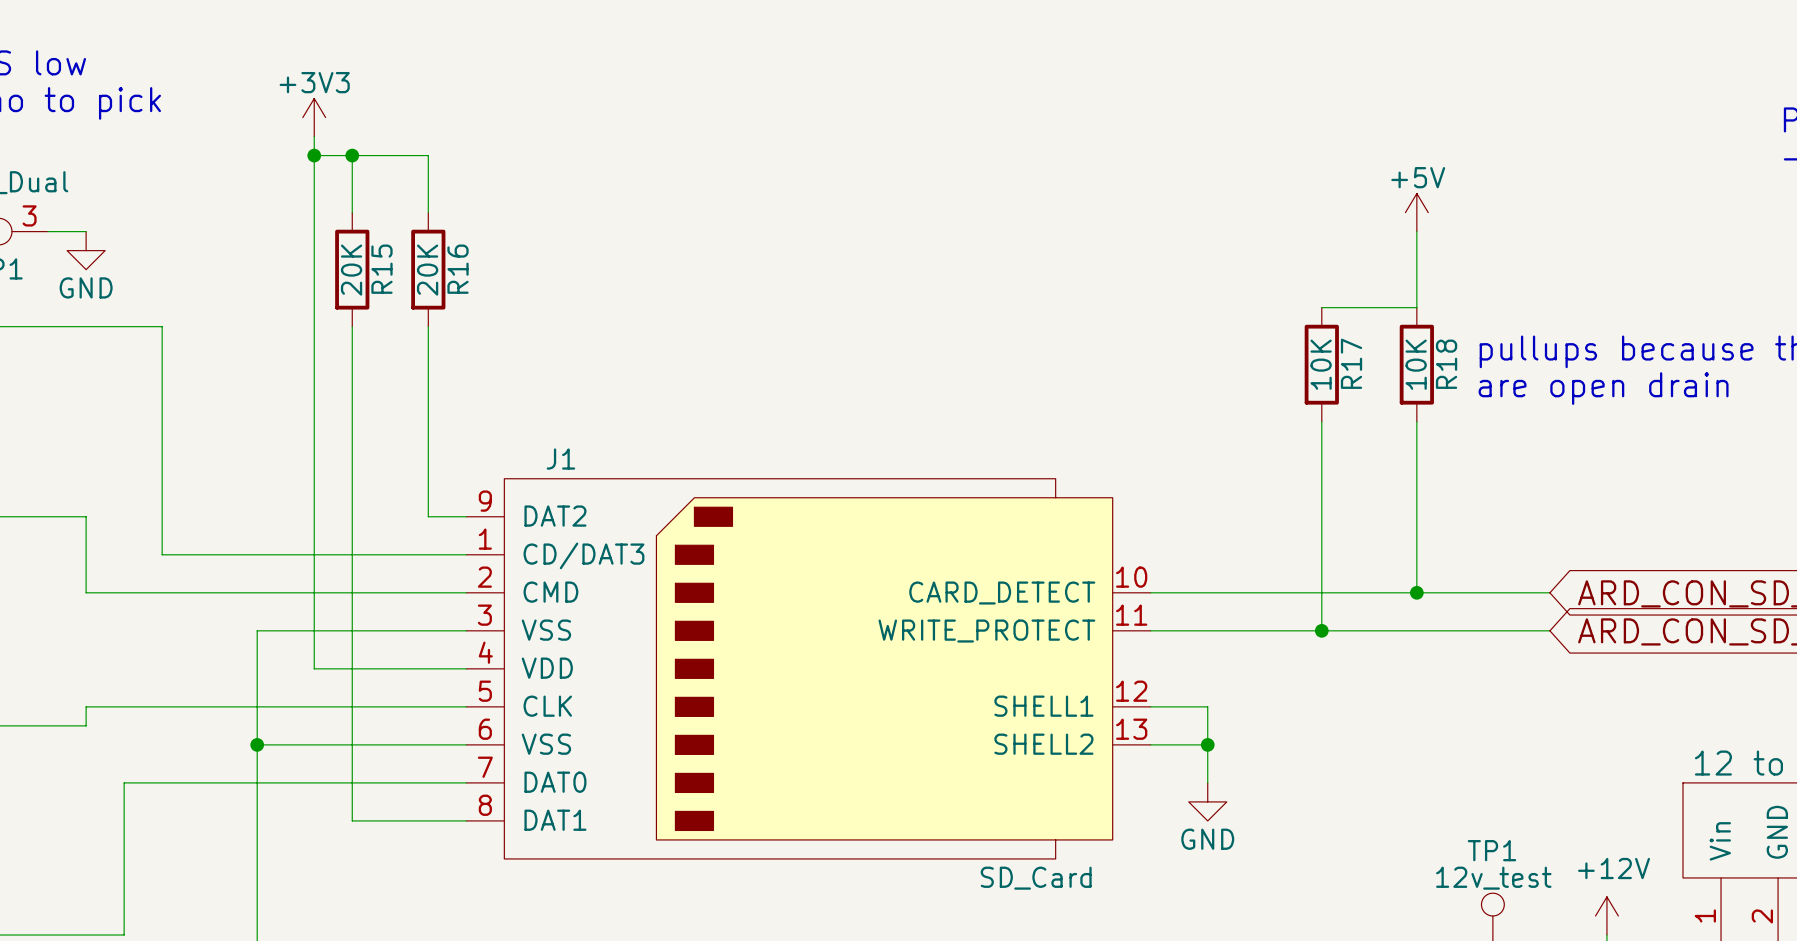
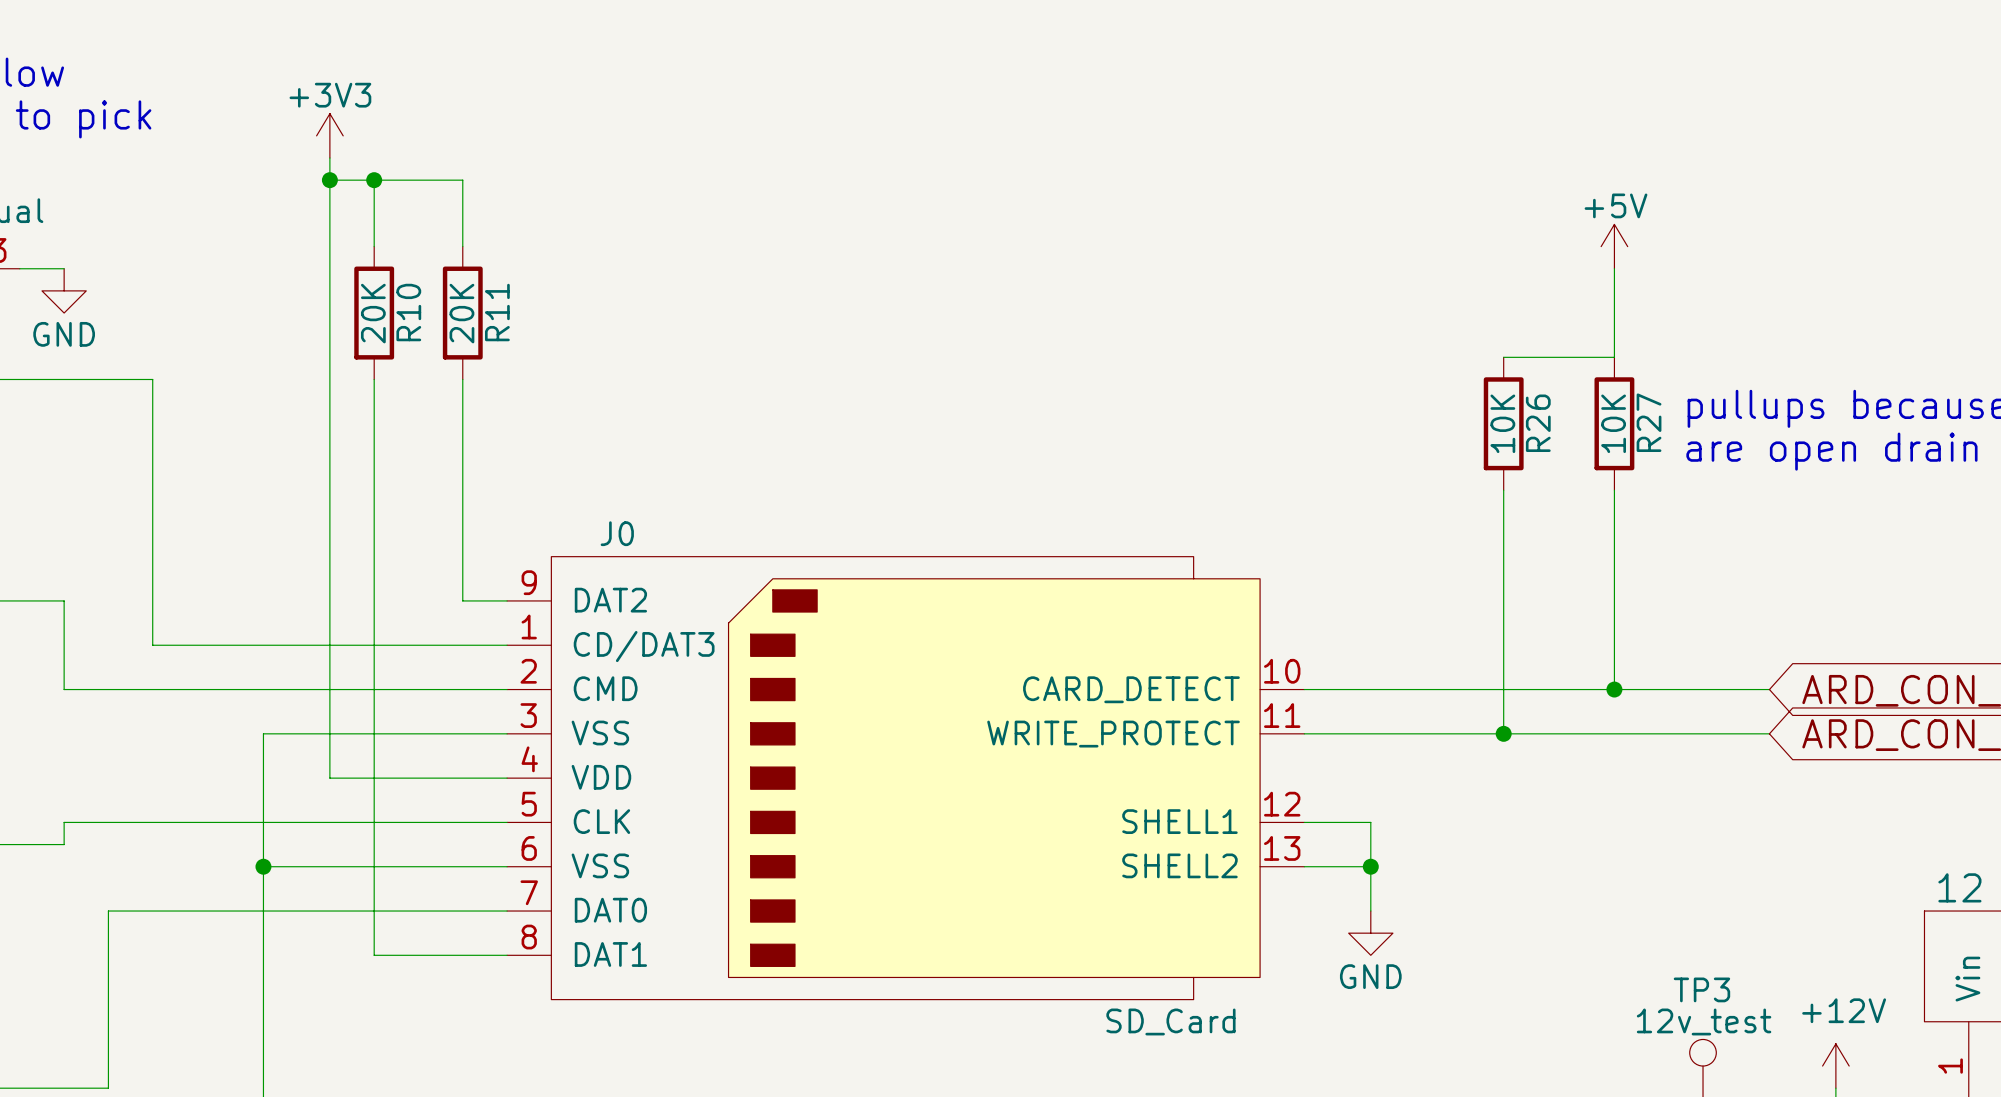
R15 name: R15 (381, 269) -> R10 (408, 312)
R16 name: R16 (458, 269) -> R11 (497, 312)
R17 name: R17 (1351, 363) -> R26 (1538, 423)
R18 name: R18 (1446, 364) -> R27 (1649, 422)
J1 name: J1 (560, 459) -> J0 (617, 533)
TP1 name: TP1 (1491, 850) -> TP3 (1701, 989)

